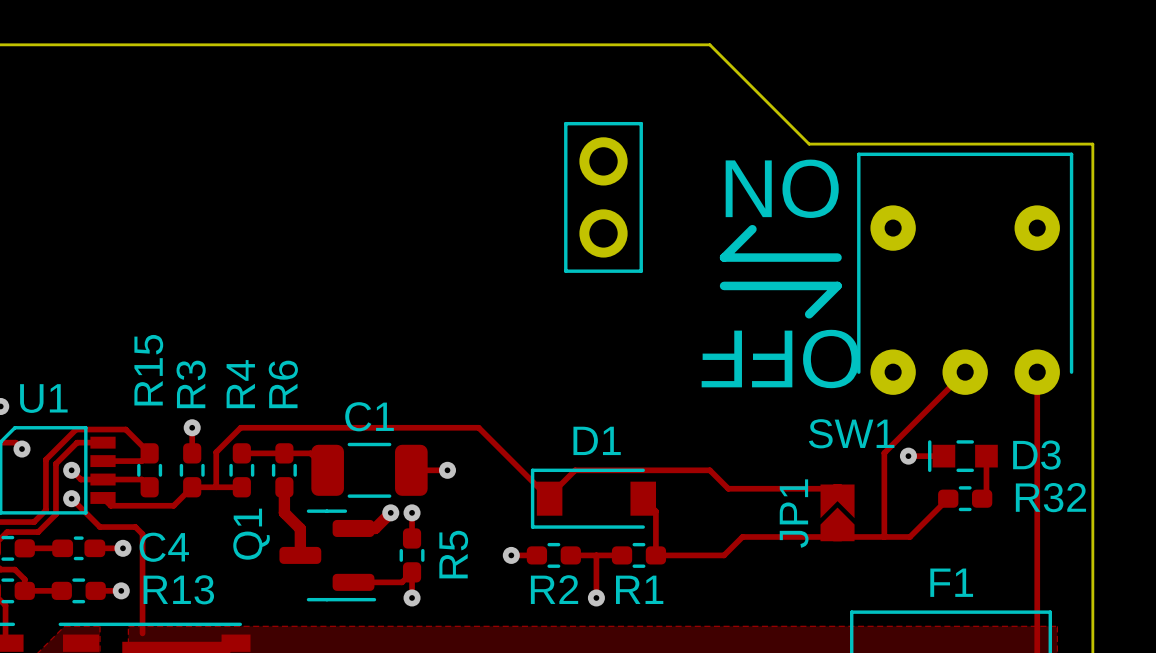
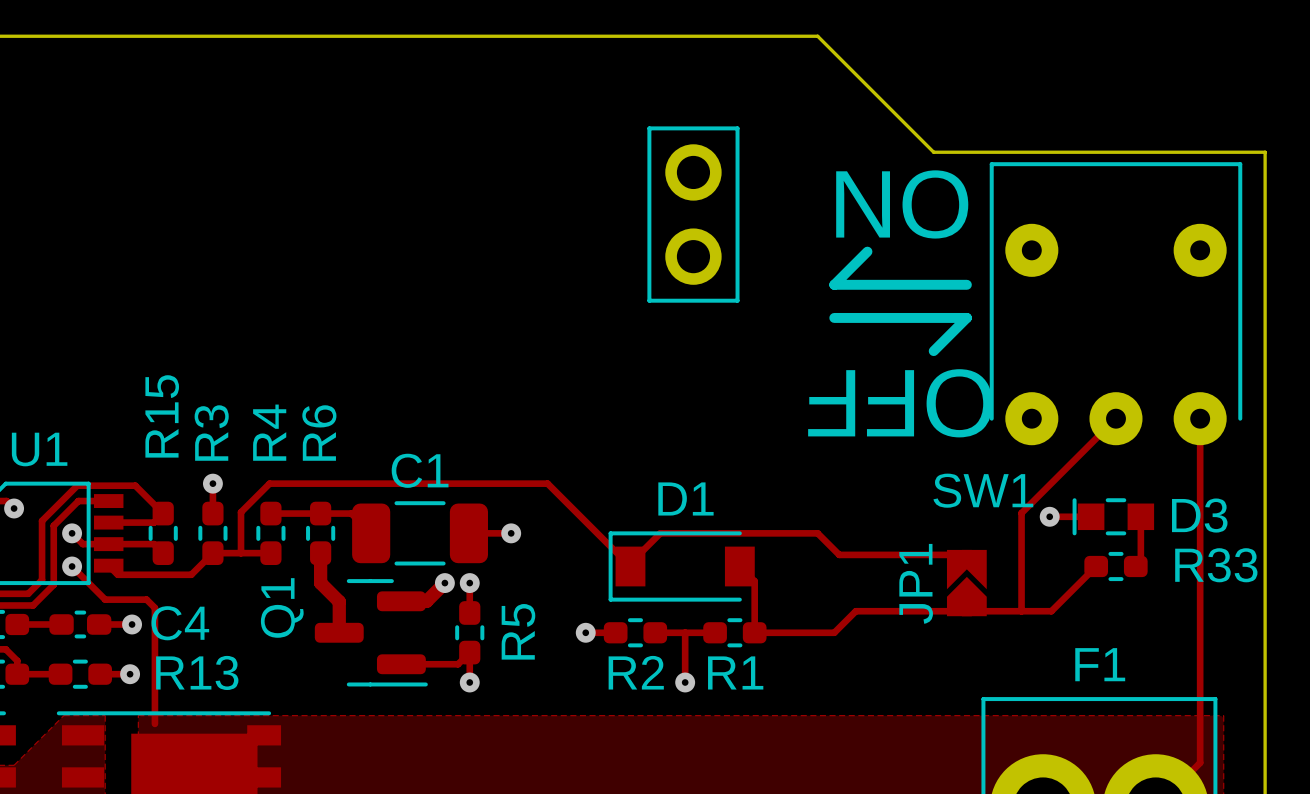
R32 name: R32 (1050, 497) -> R33 (1216, 565)

